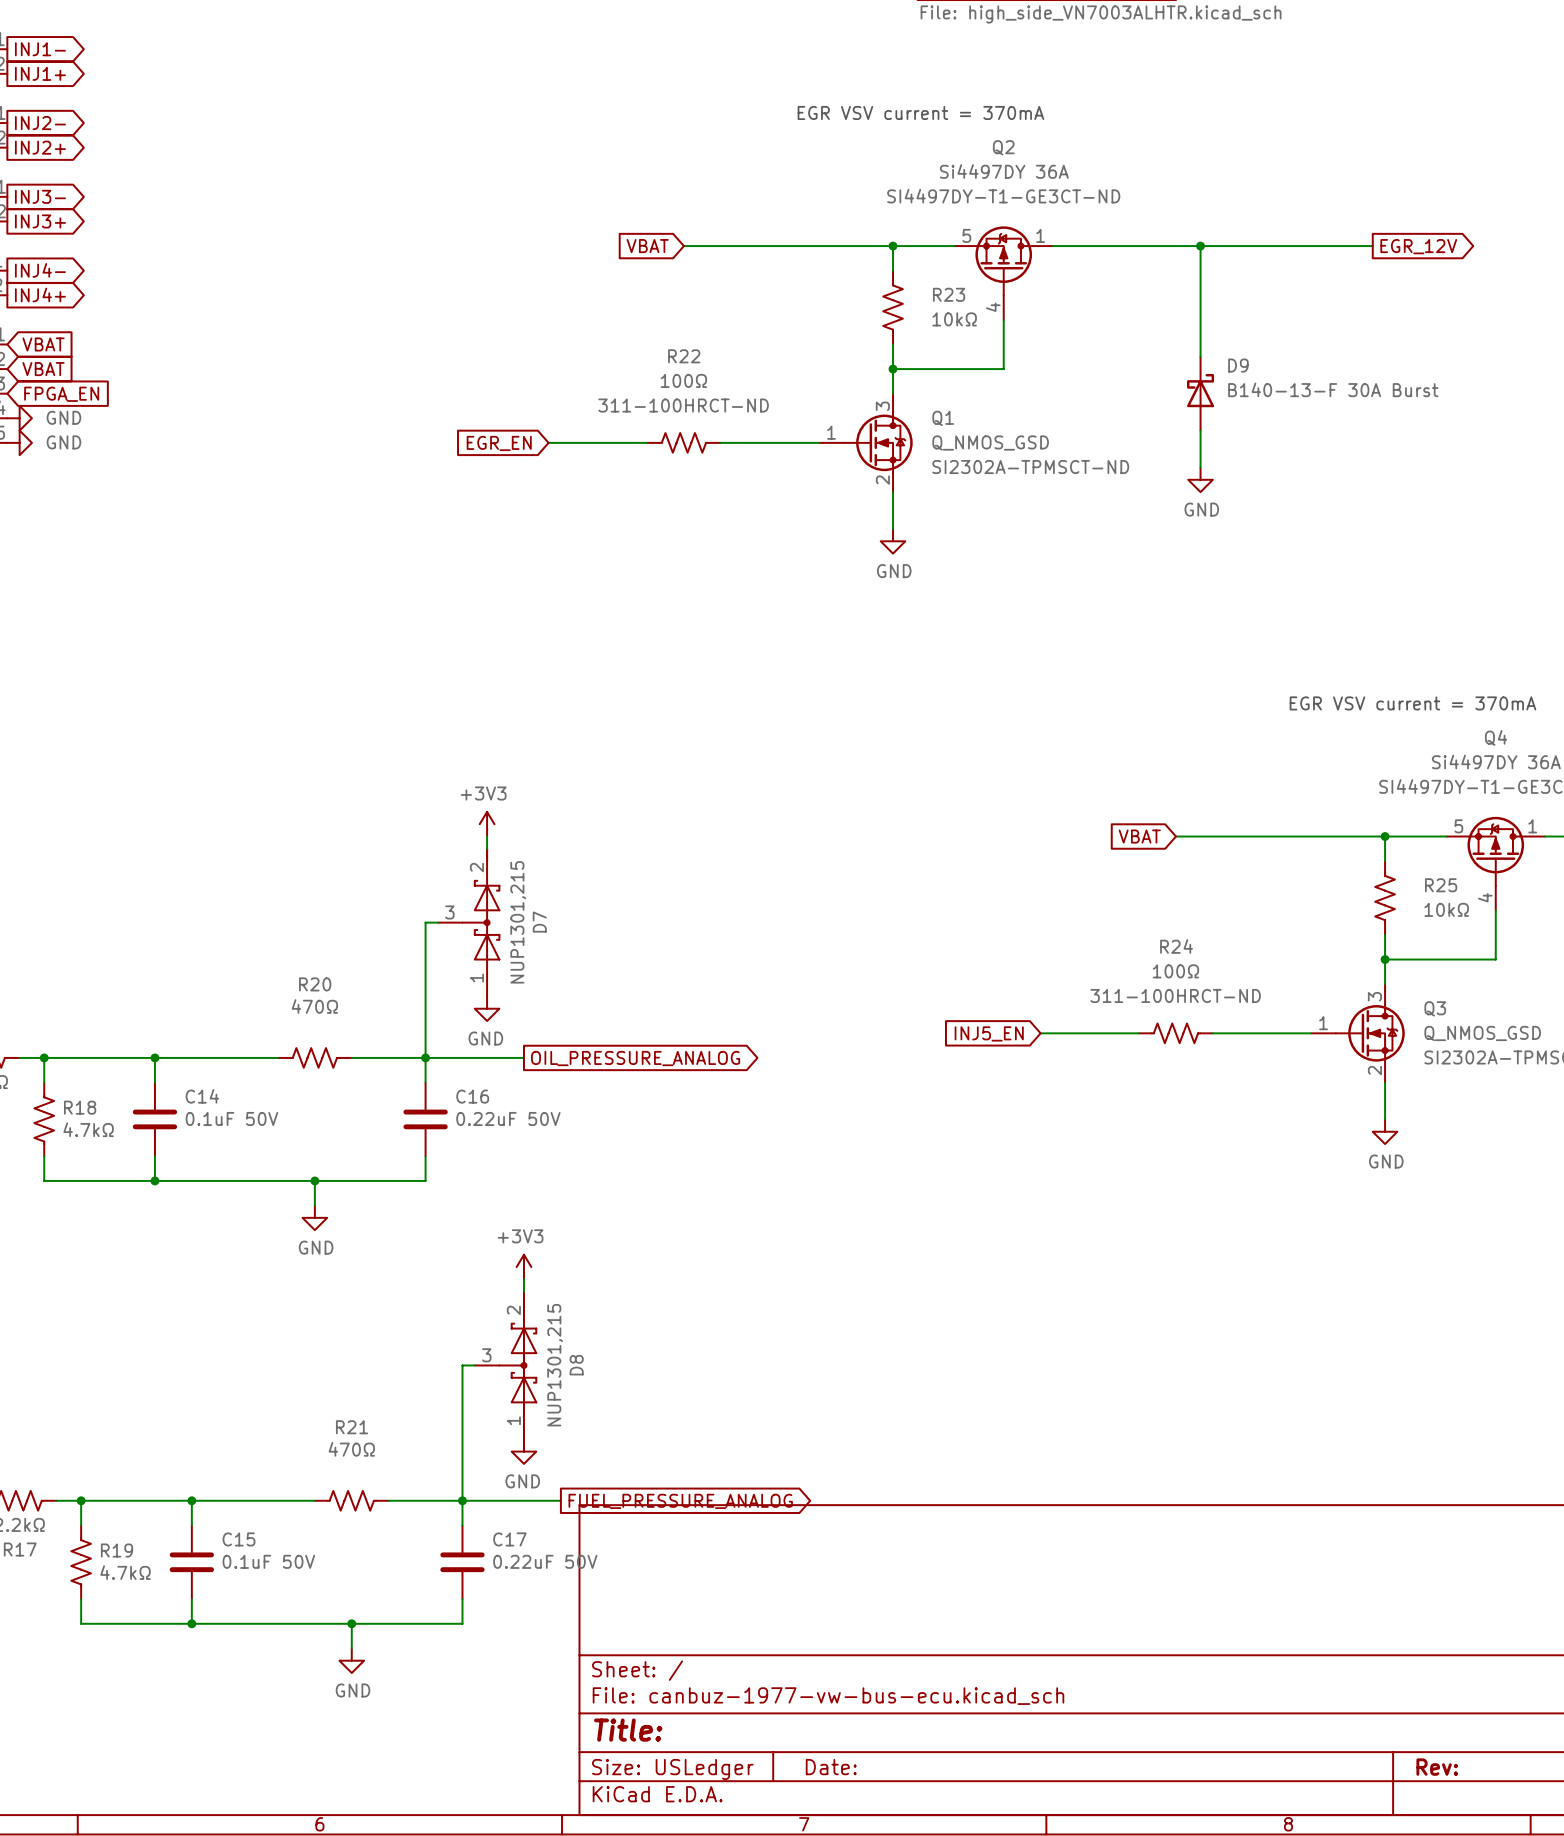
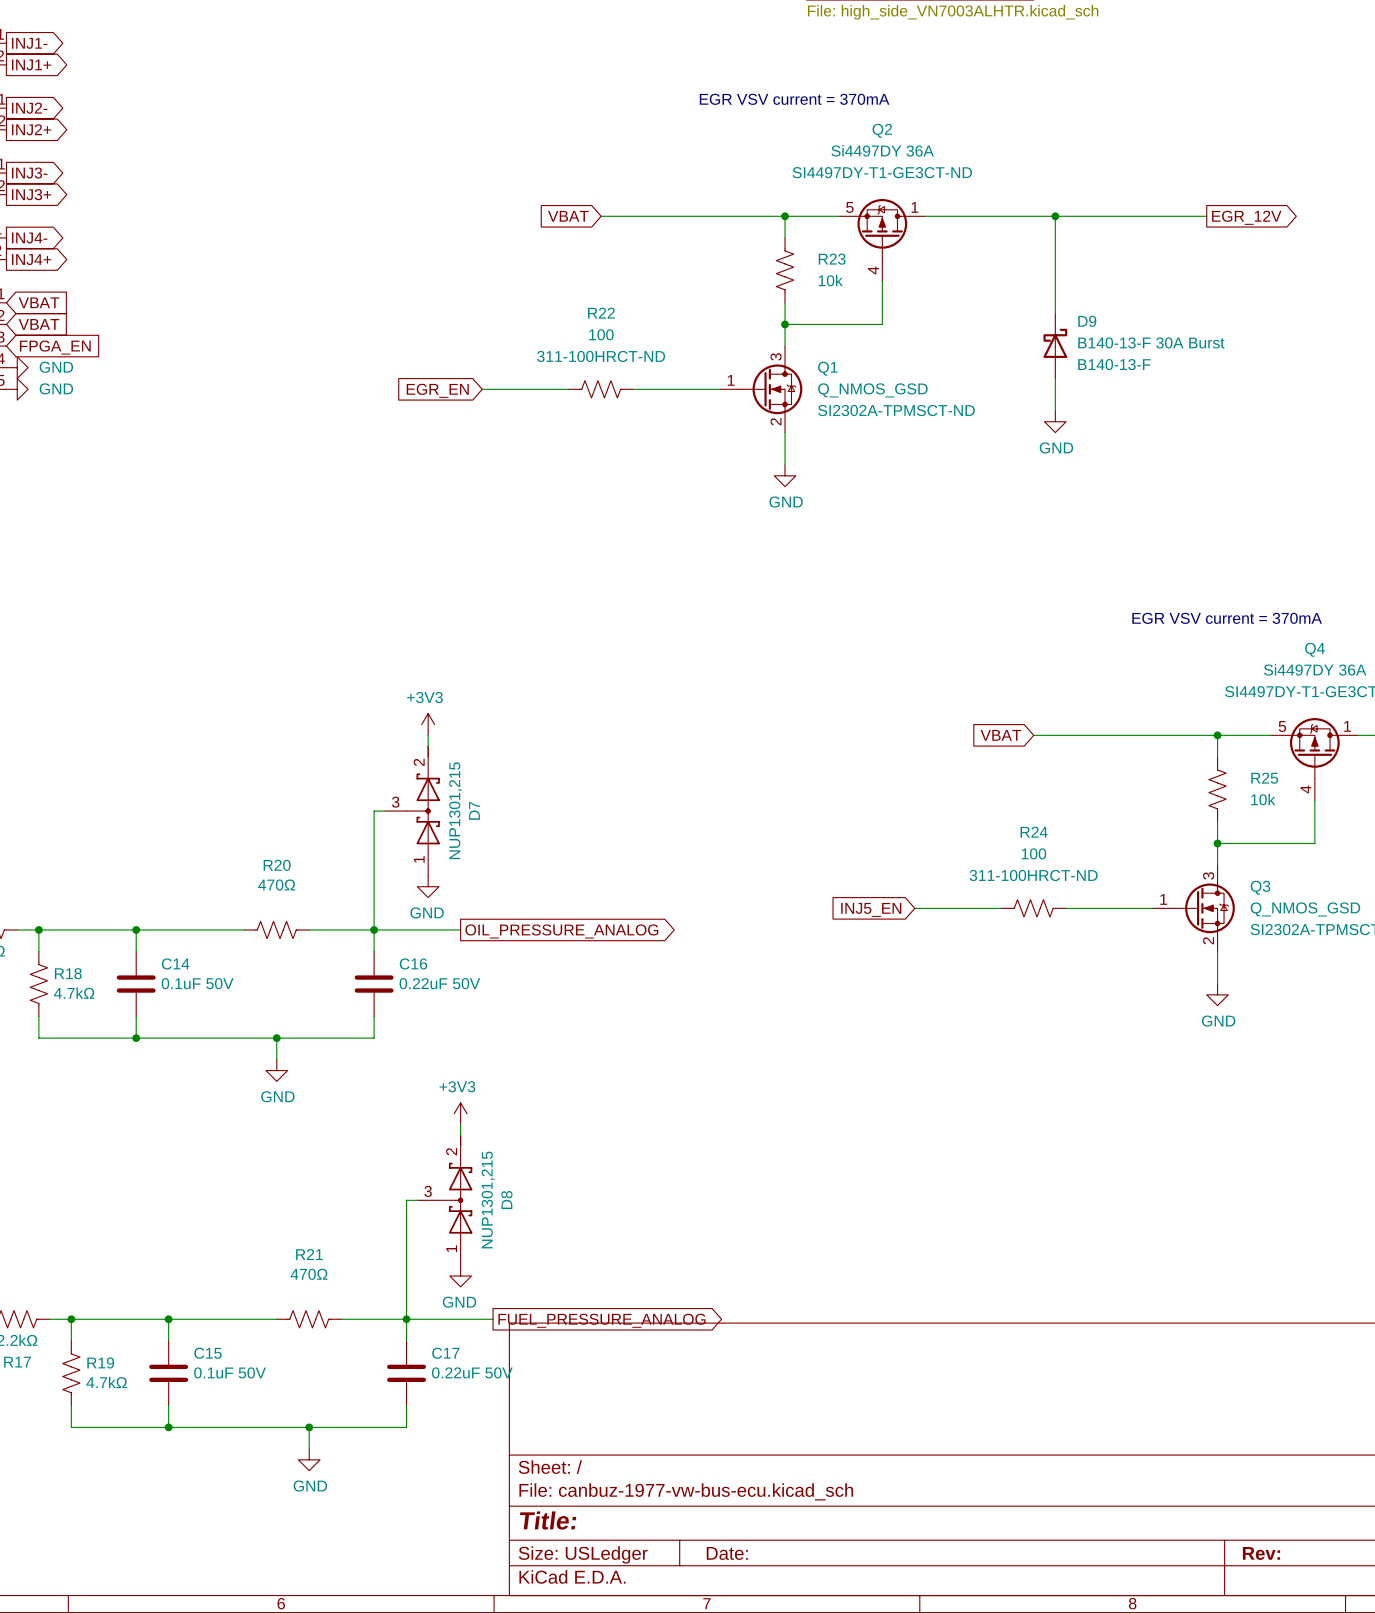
R23 value: 10kΩ (954, 319) -> 10k (830, 280)
R22 value: 100Ω (683, 380) -> 100 (601, 334)
D9 text: none -> B140-13-F (1114, 364)
R25 value: 10kΩ (1446, 909) -> 10k (1263, 799)
R24 value: 100Ω (1175, 971) -> 100 (1034, 853)

